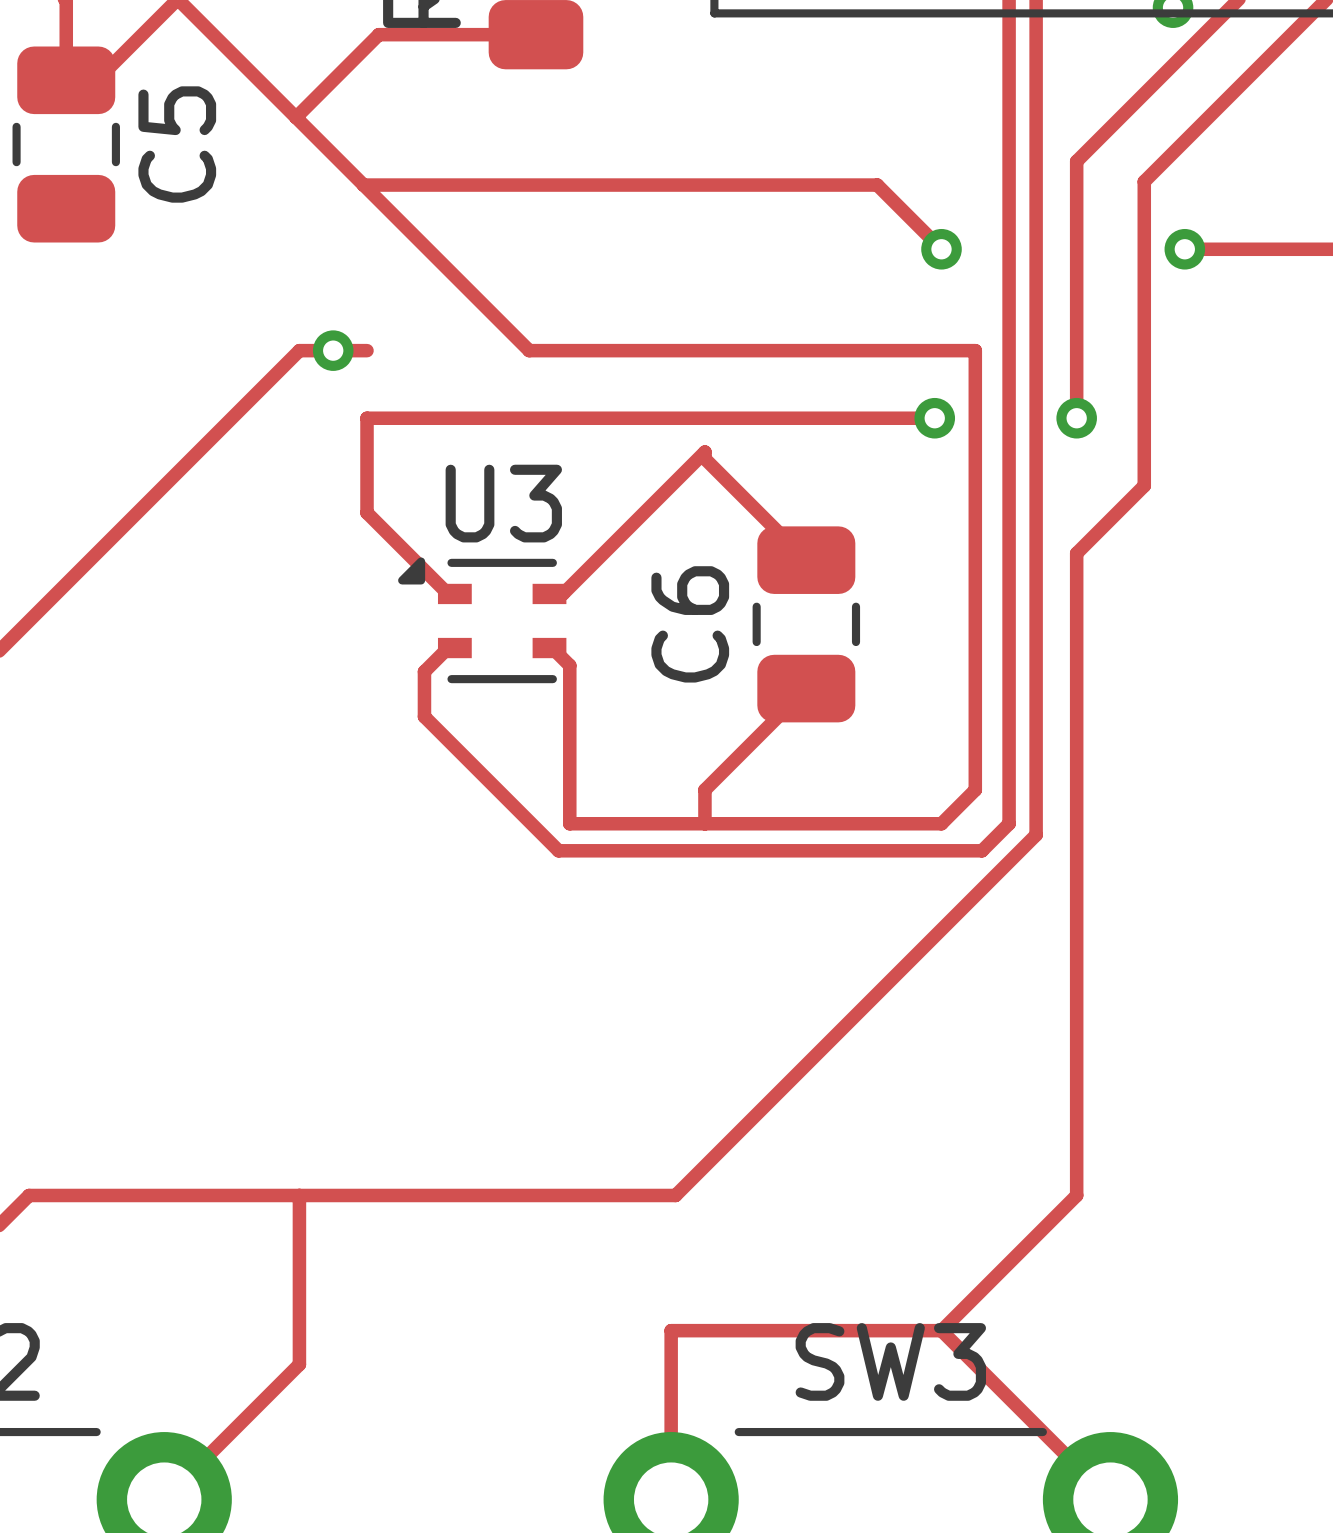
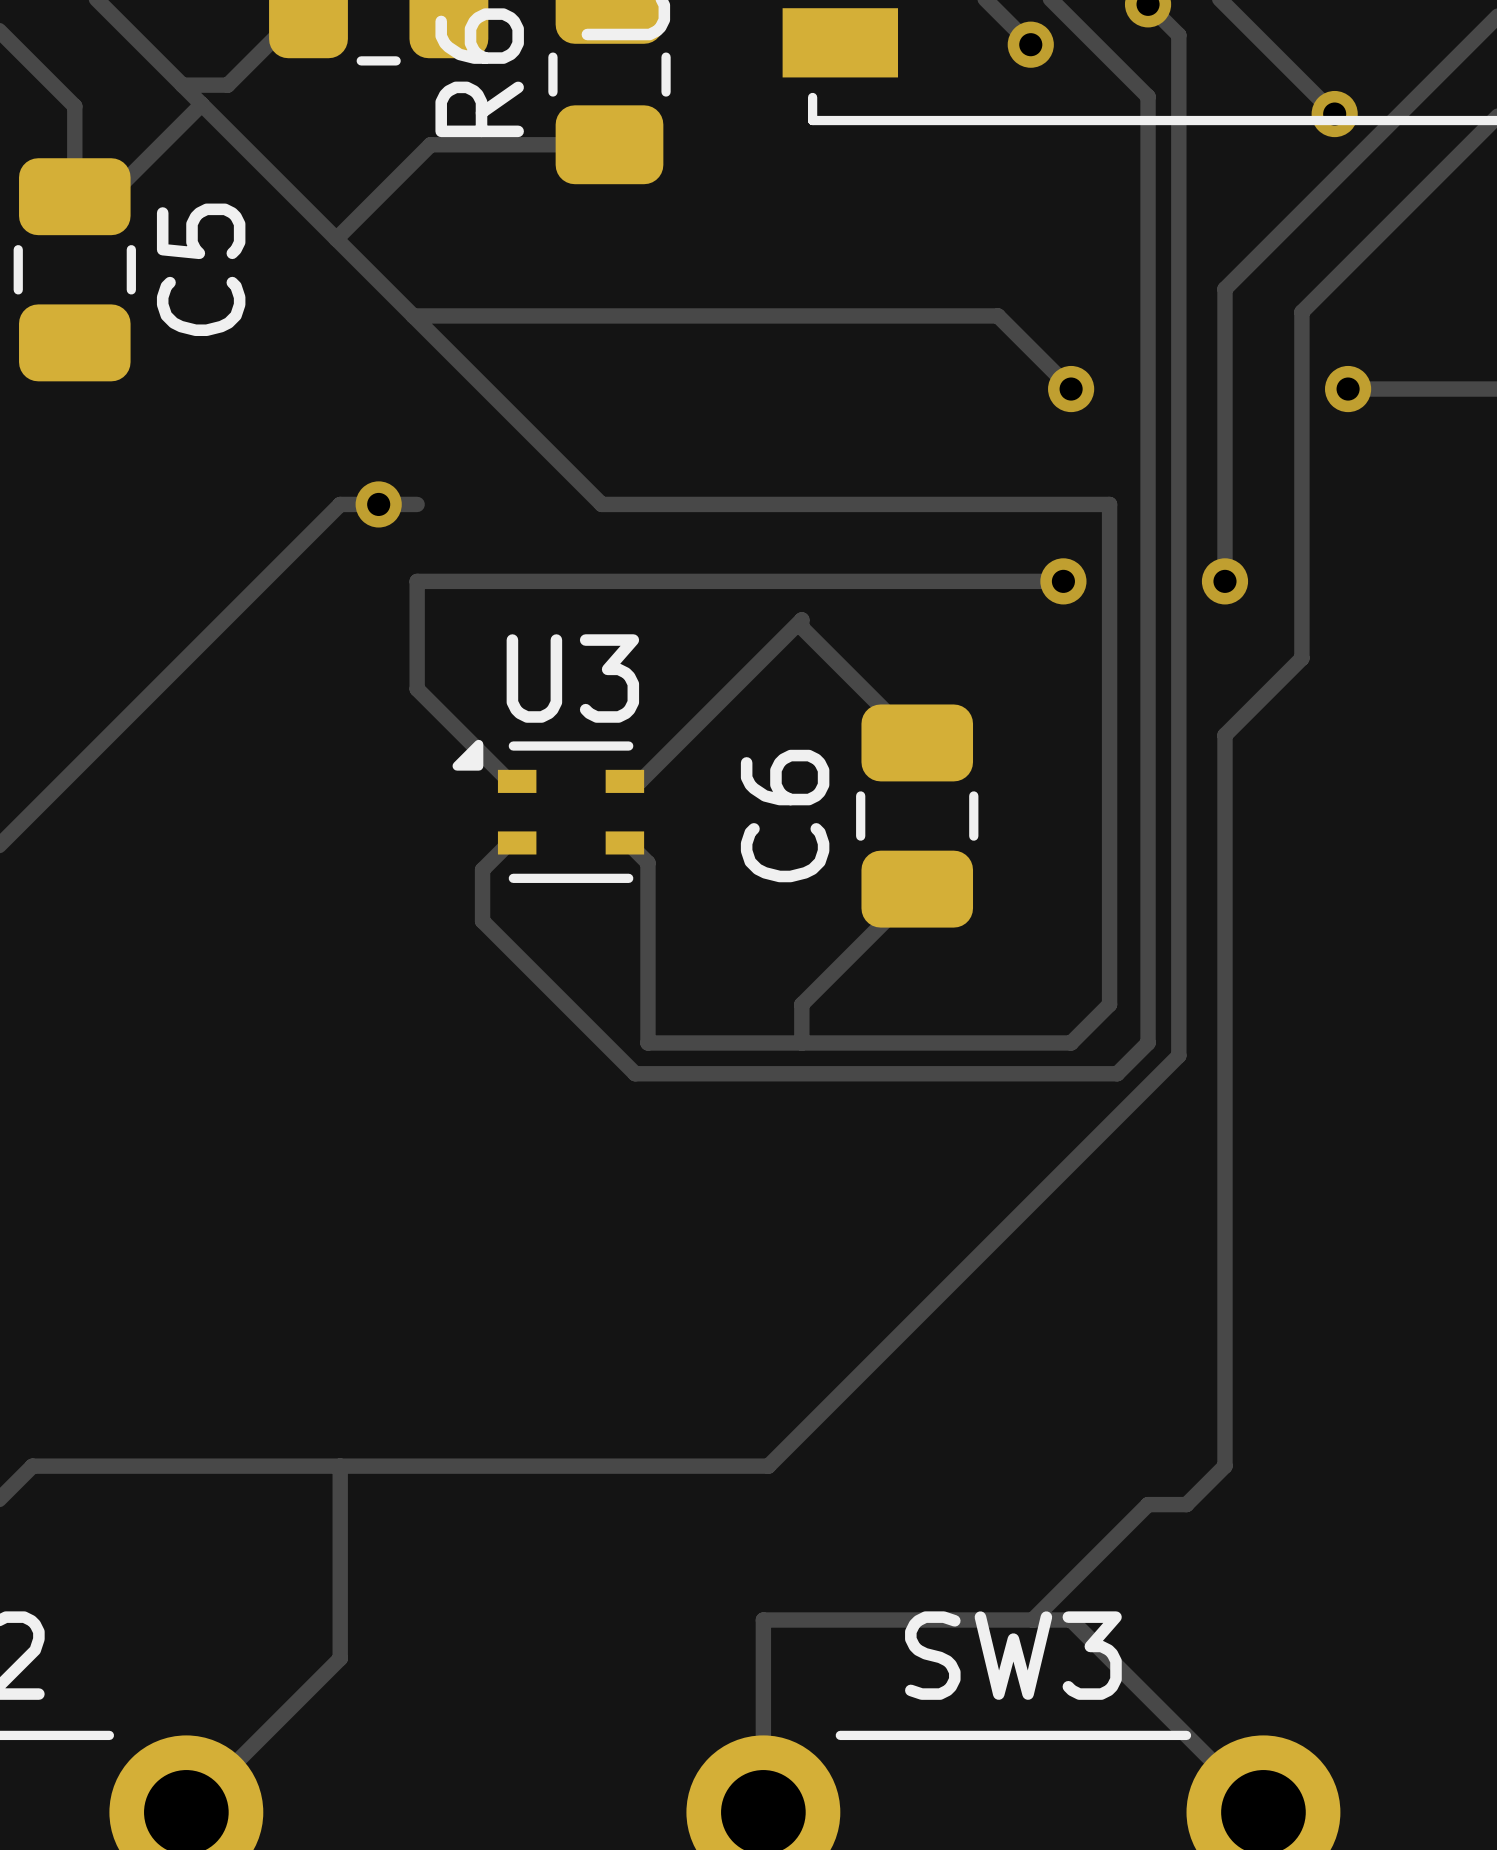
track: (1042, 1229) (941, 1330) -> (1186, 1504) (1148, 1504) (1032, 1620)

